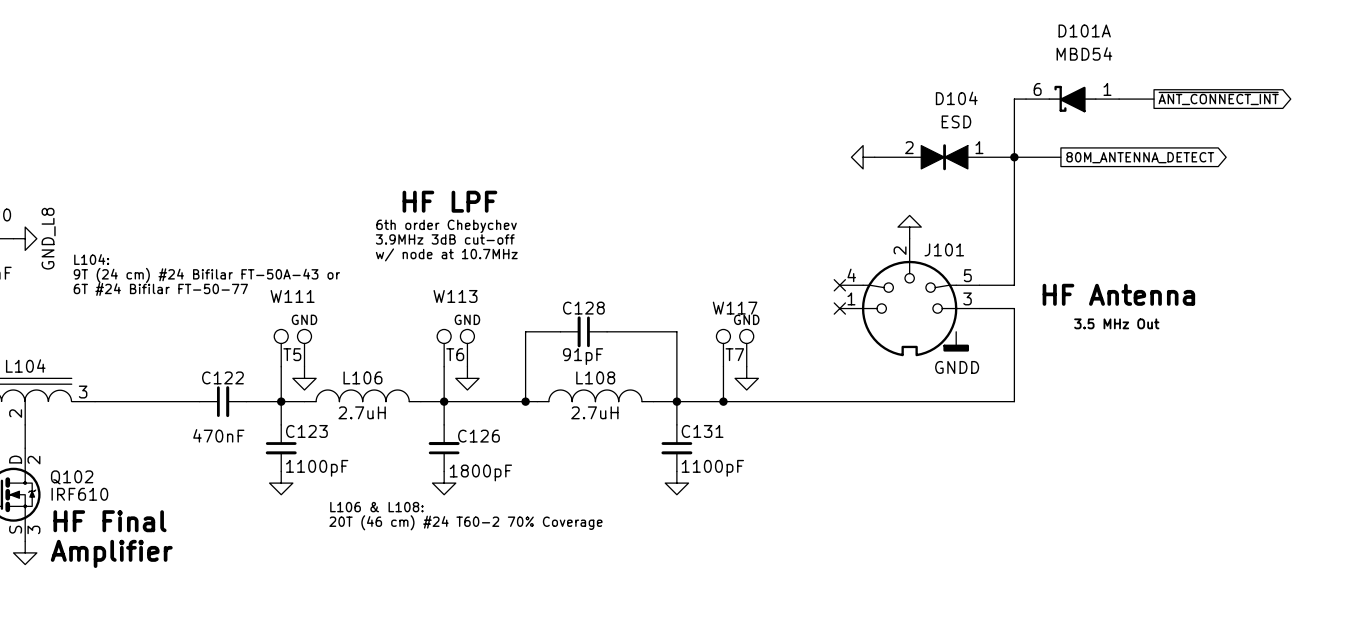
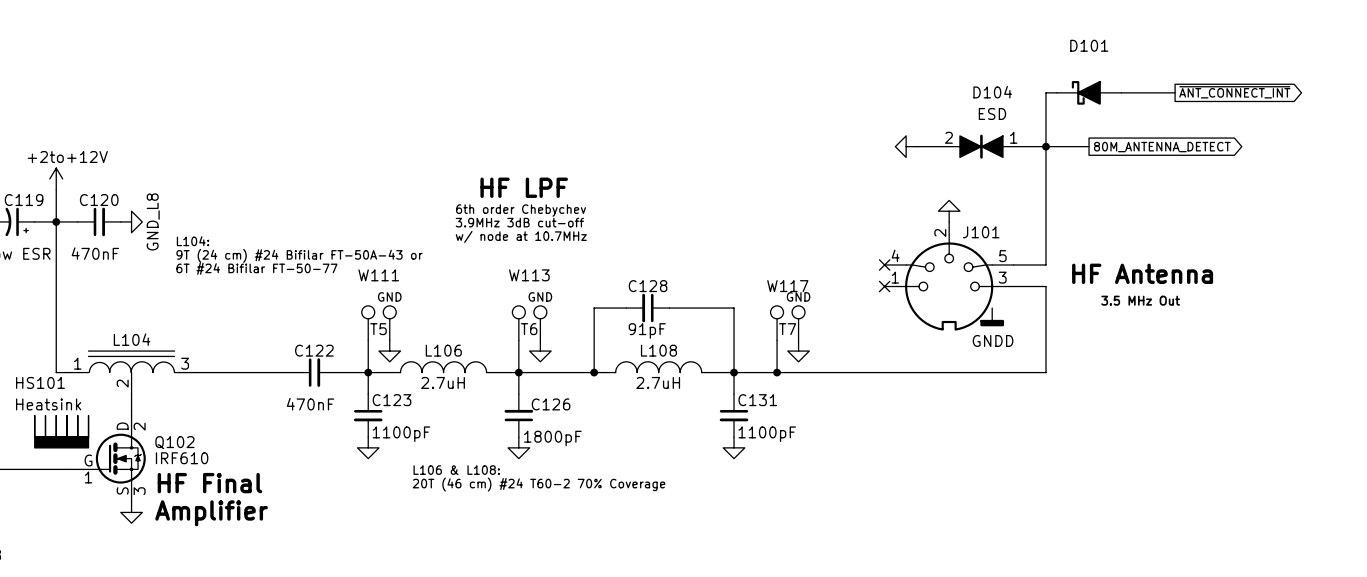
D101: none -> (1089, 92)
D101A: (1072, 99) -> none

